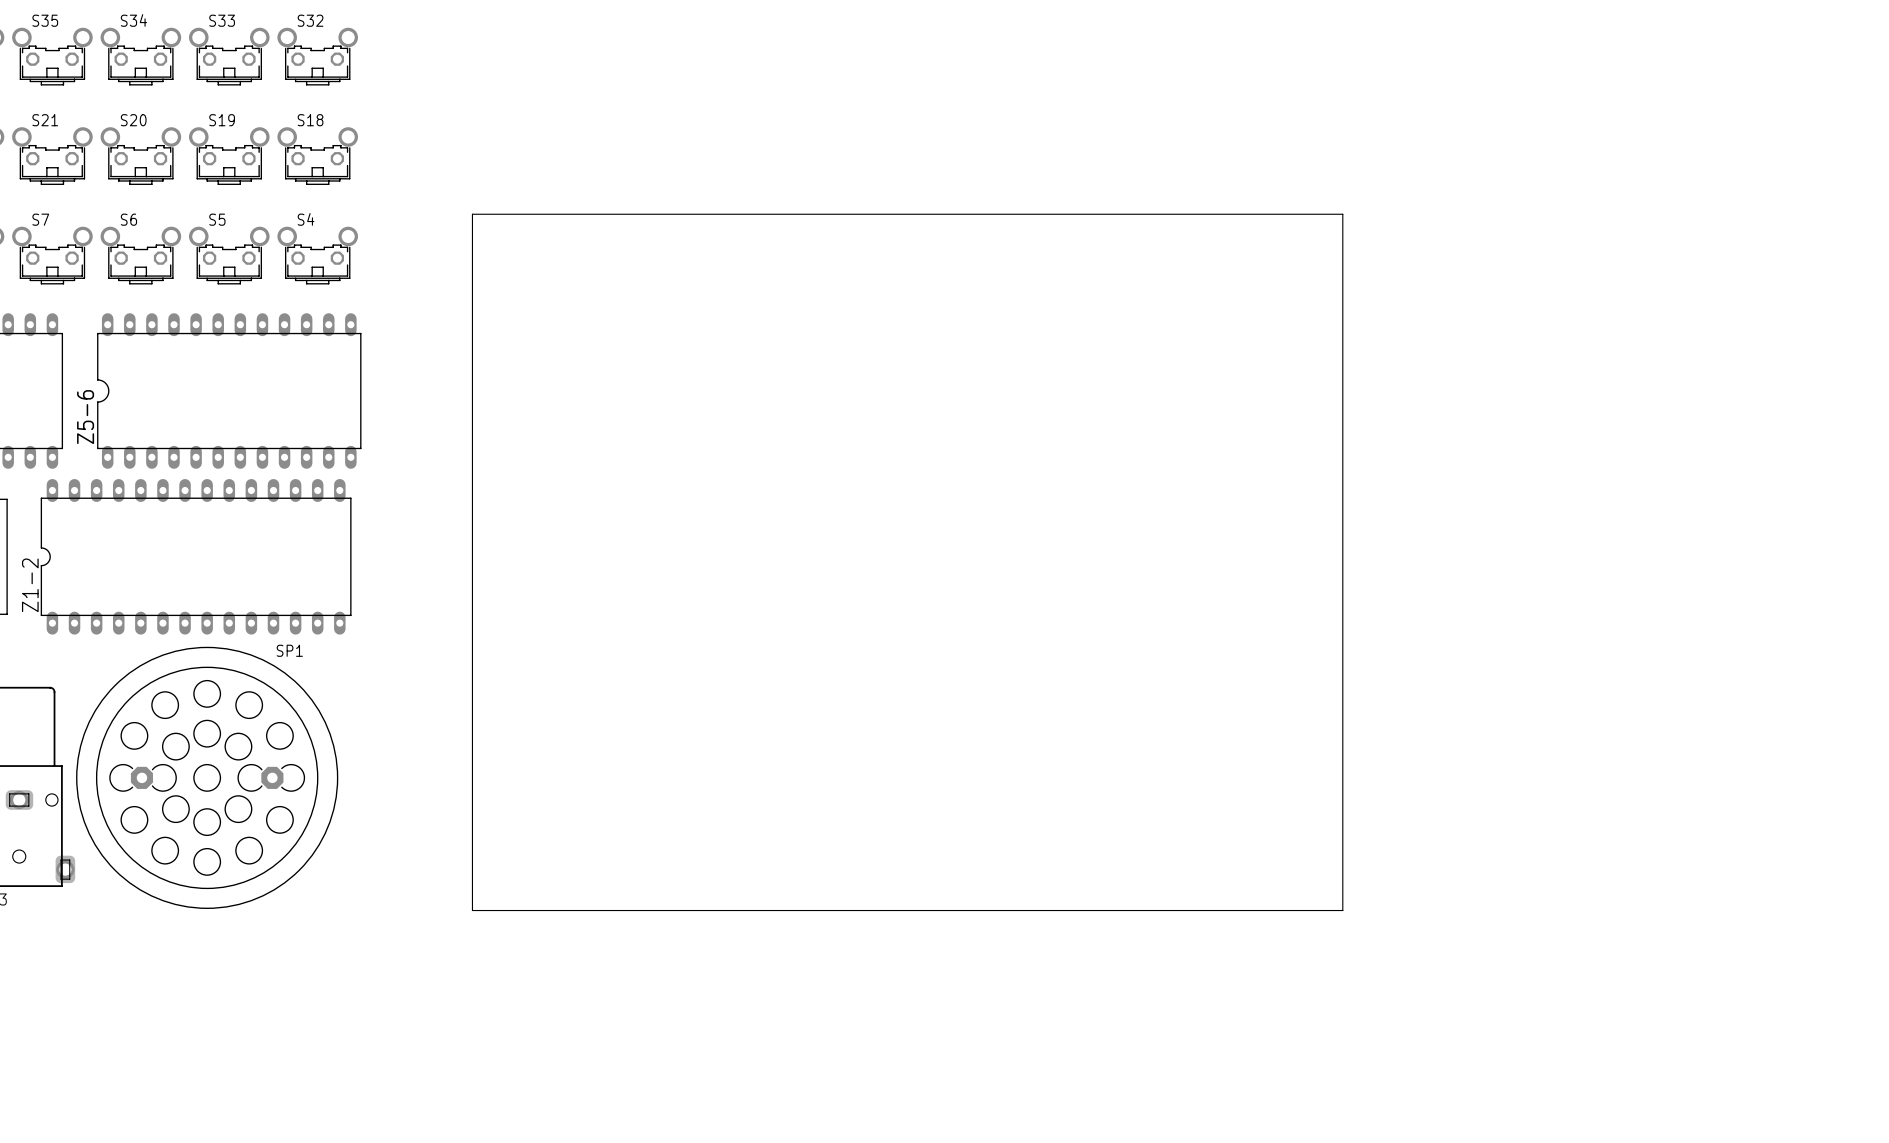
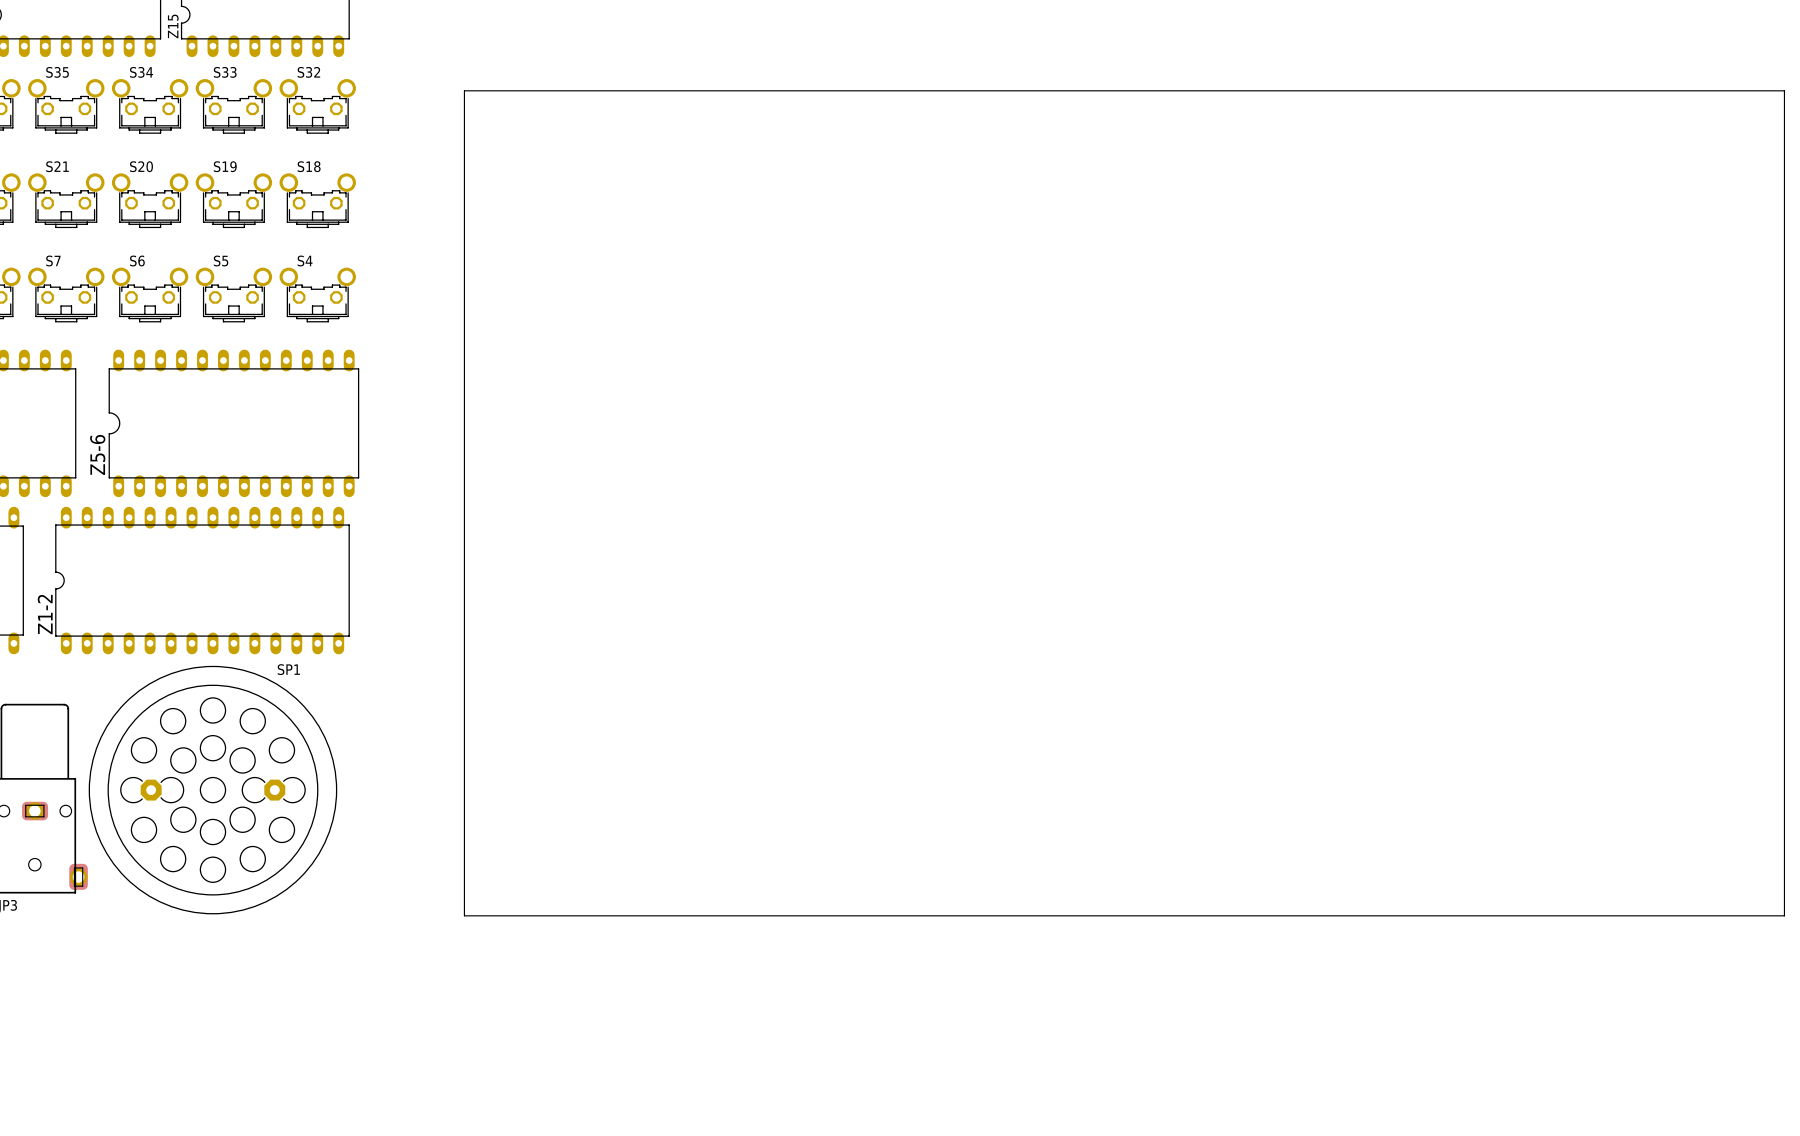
board edge: (472, 214) (1342, 214) (1342, 910) -> (464, 255) (464, 90) (1784, 90) (1784, 915) (1289, 915)

